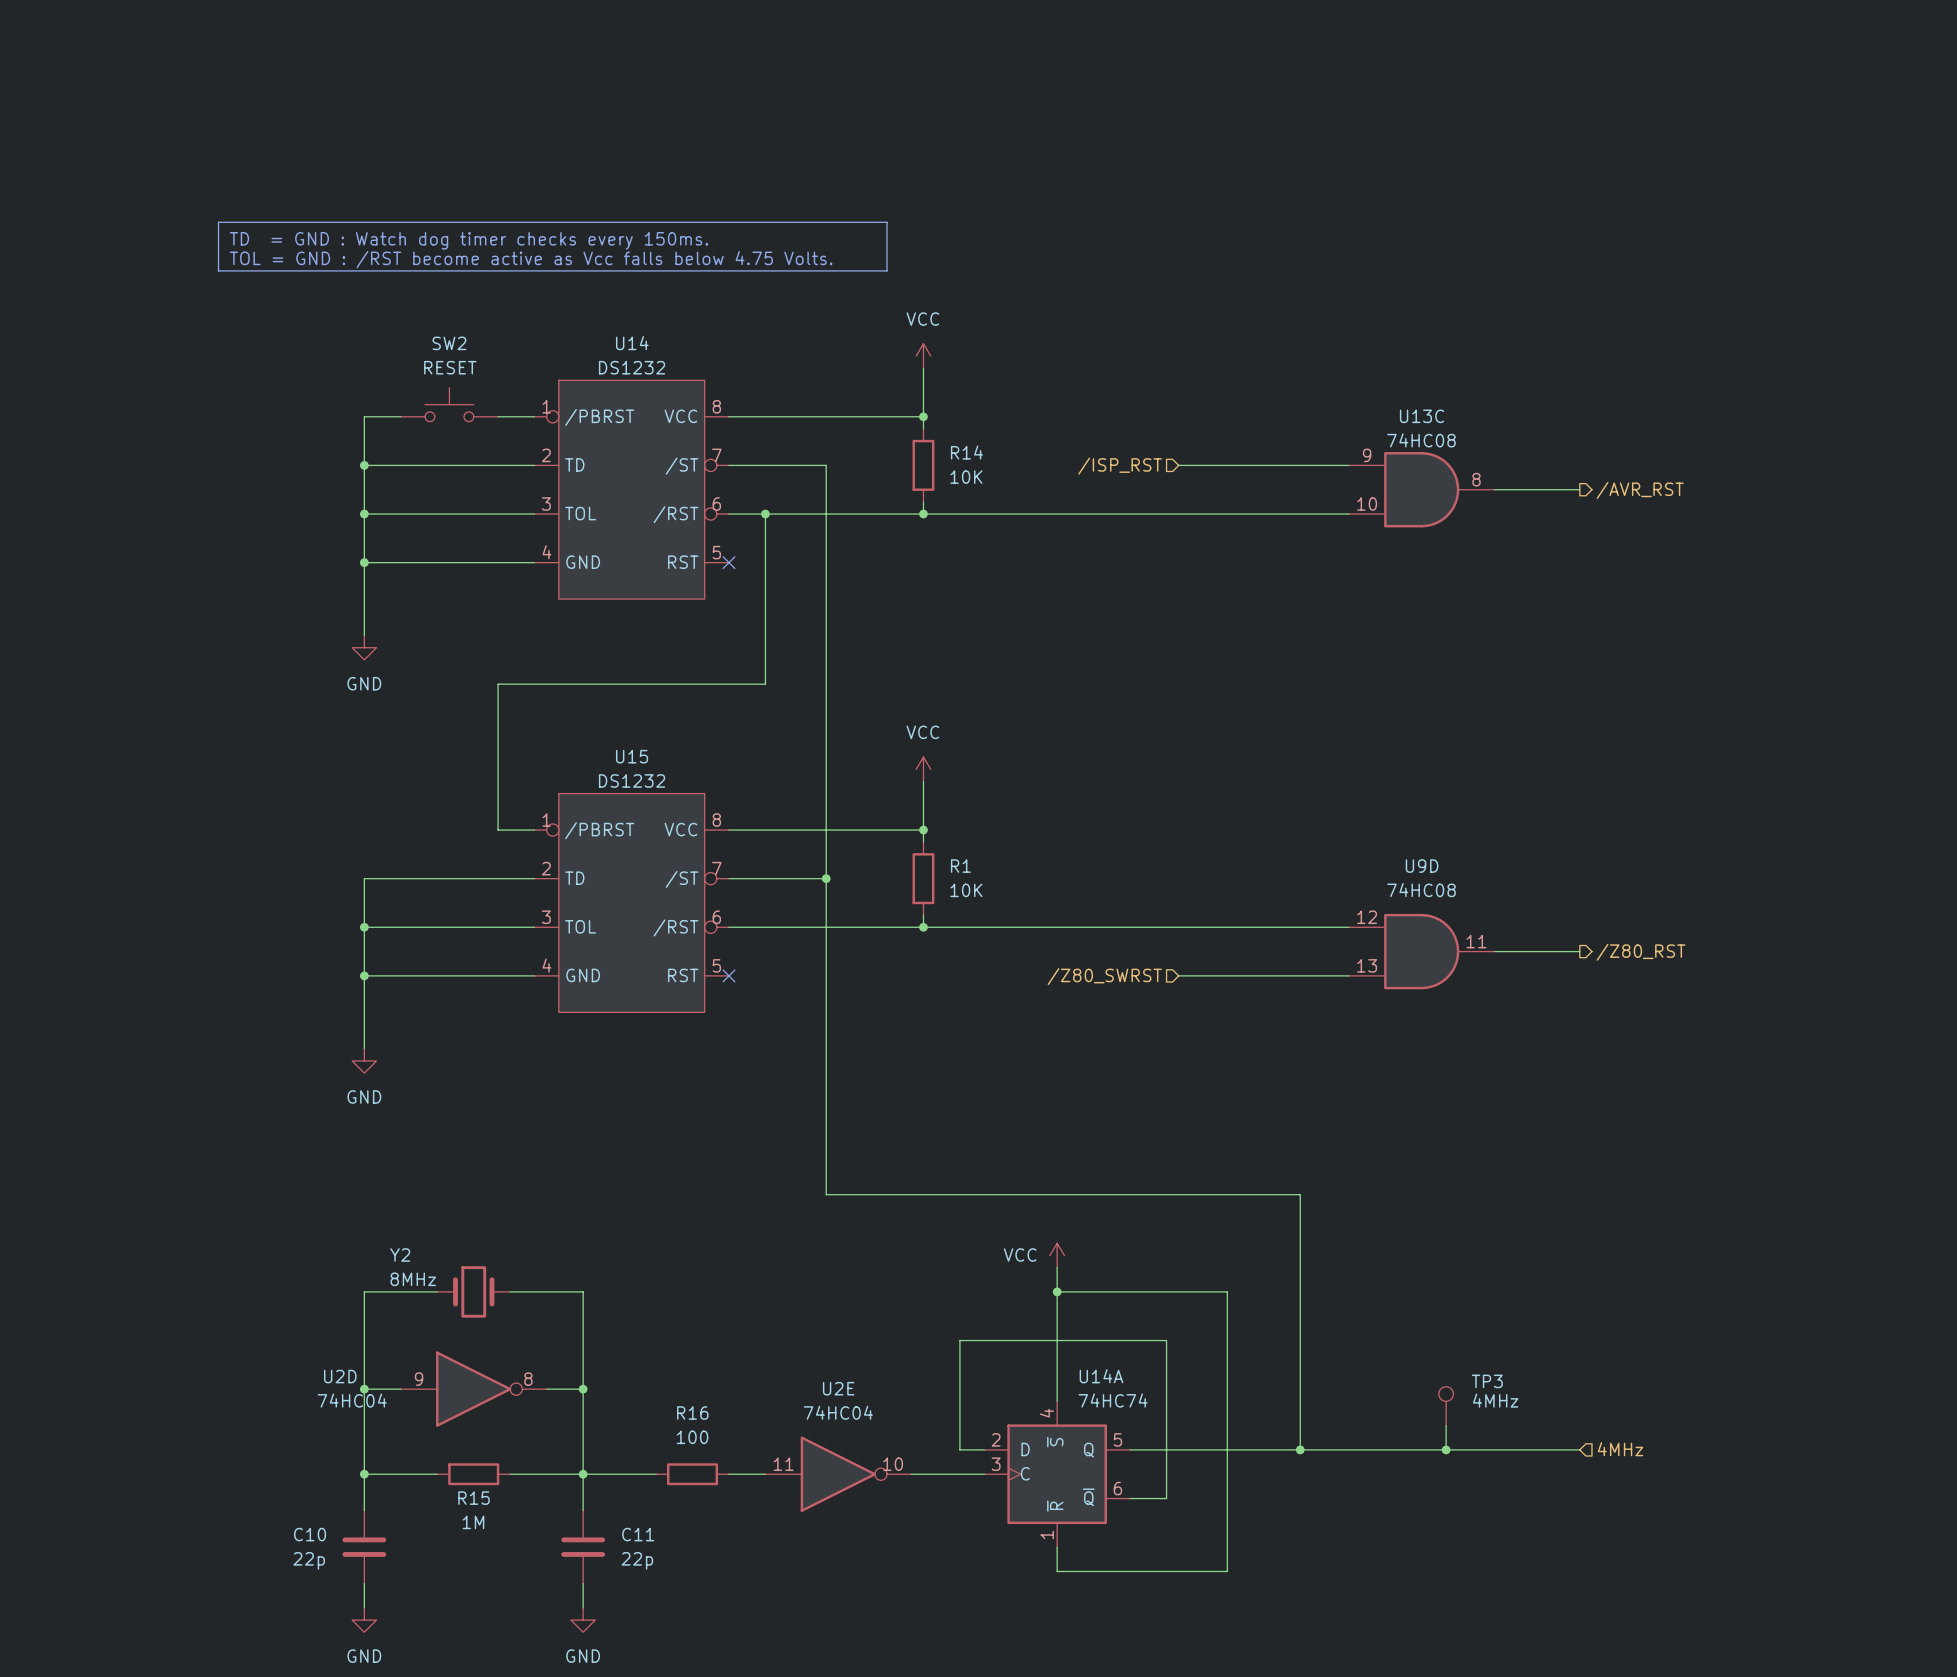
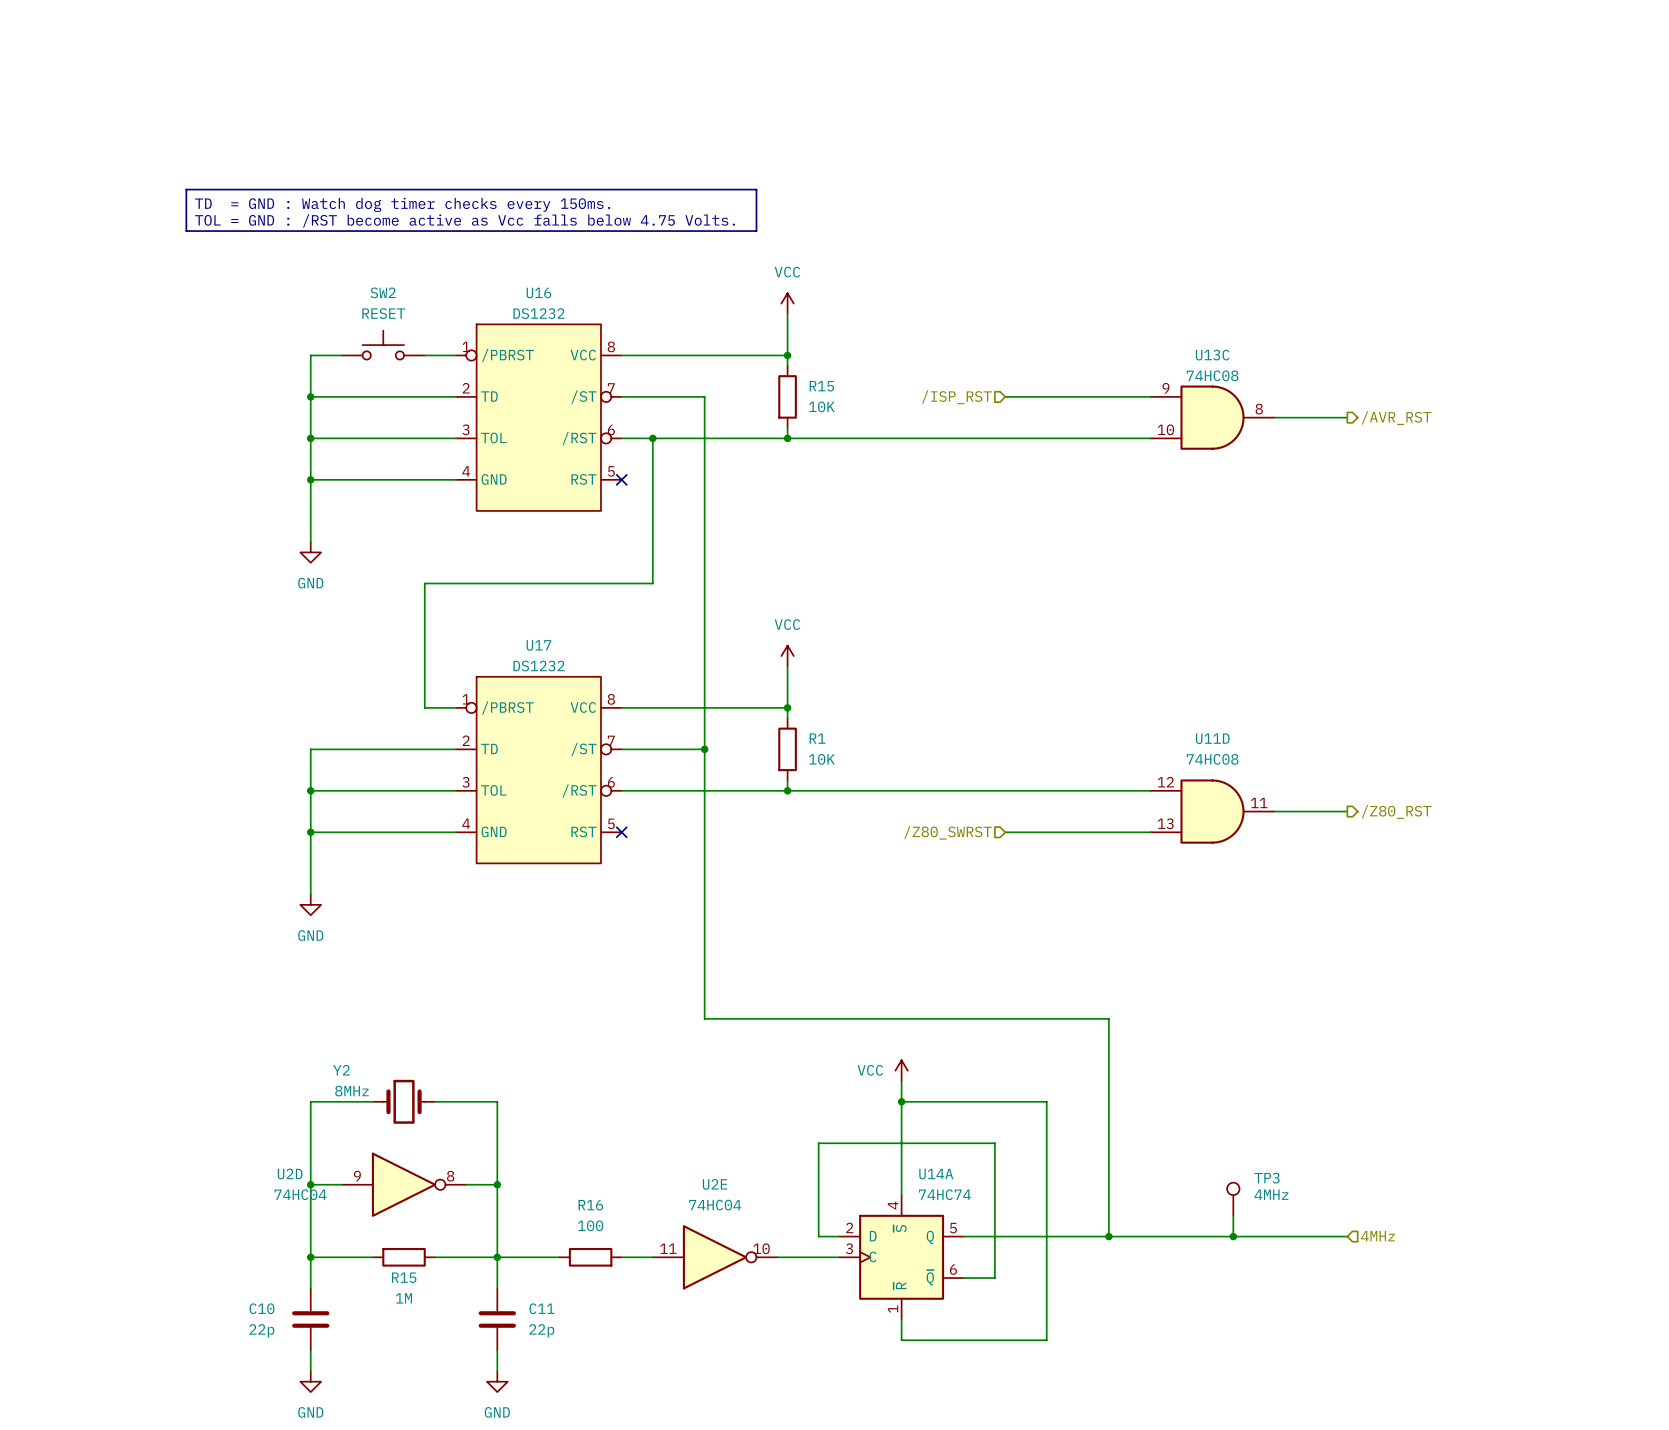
U14 name: U14 (632, 343) -> U16 (538, 292)
R14 name: R14 (966, 452) -> R15 (821, 386)
U15 name: U15 (632, 756) -> U17 (538, 645)
U9D name: U9D (1422, 866) -> U11D (1212, 738)

